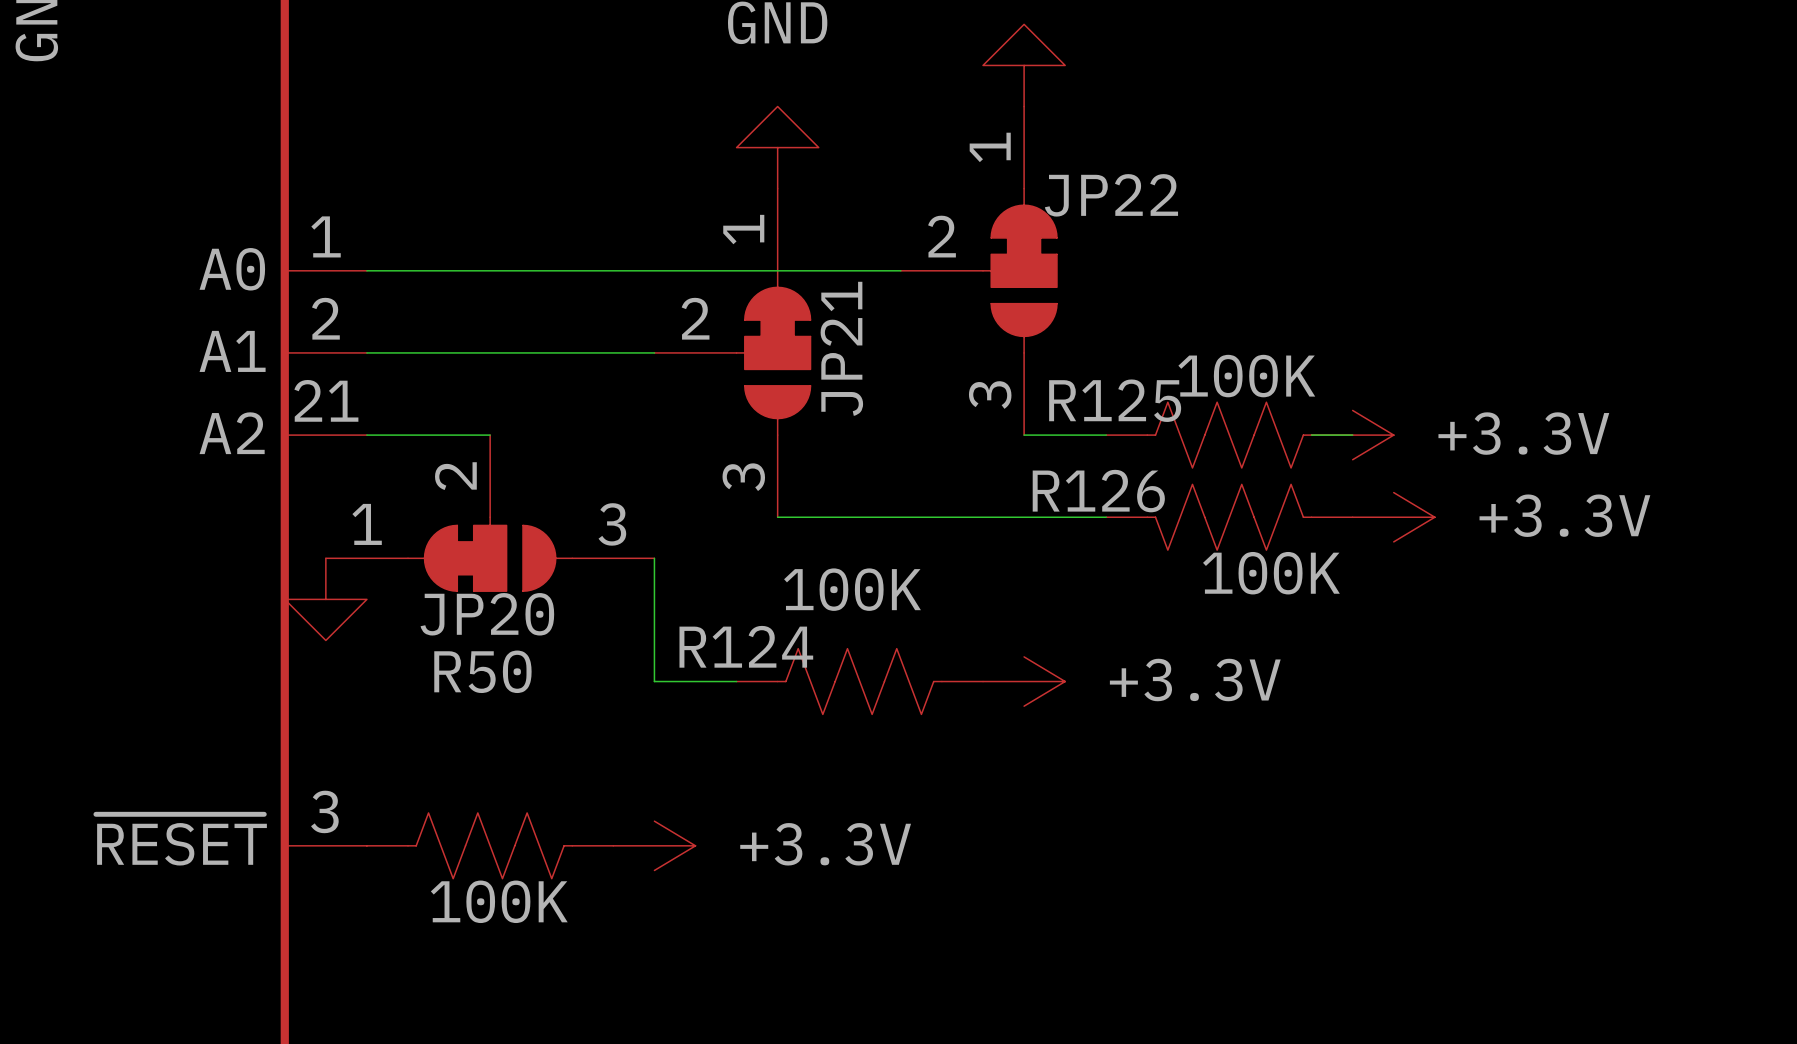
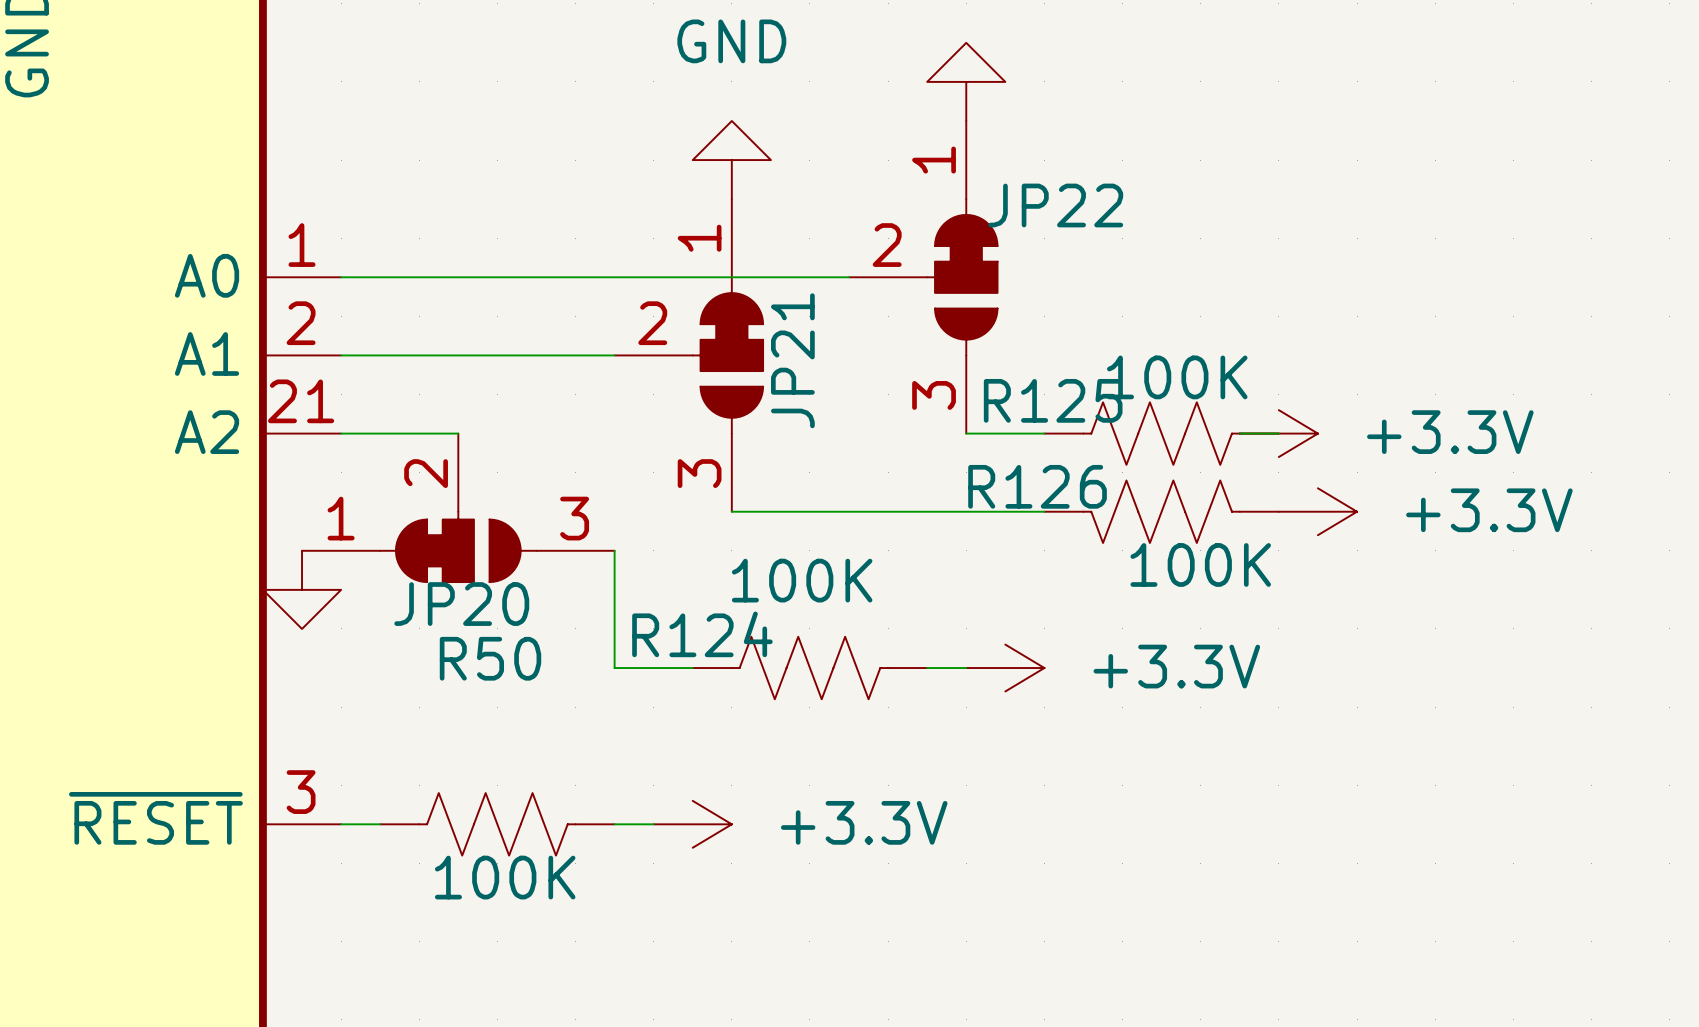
power symbol position: +3.3V (1024, 681) -> +3.3V (1005, 668)
R50 position: (490, 845) -> (497, 824)
power symbol position: +3.3V (654, 845) -> +3.3V (692, 824)

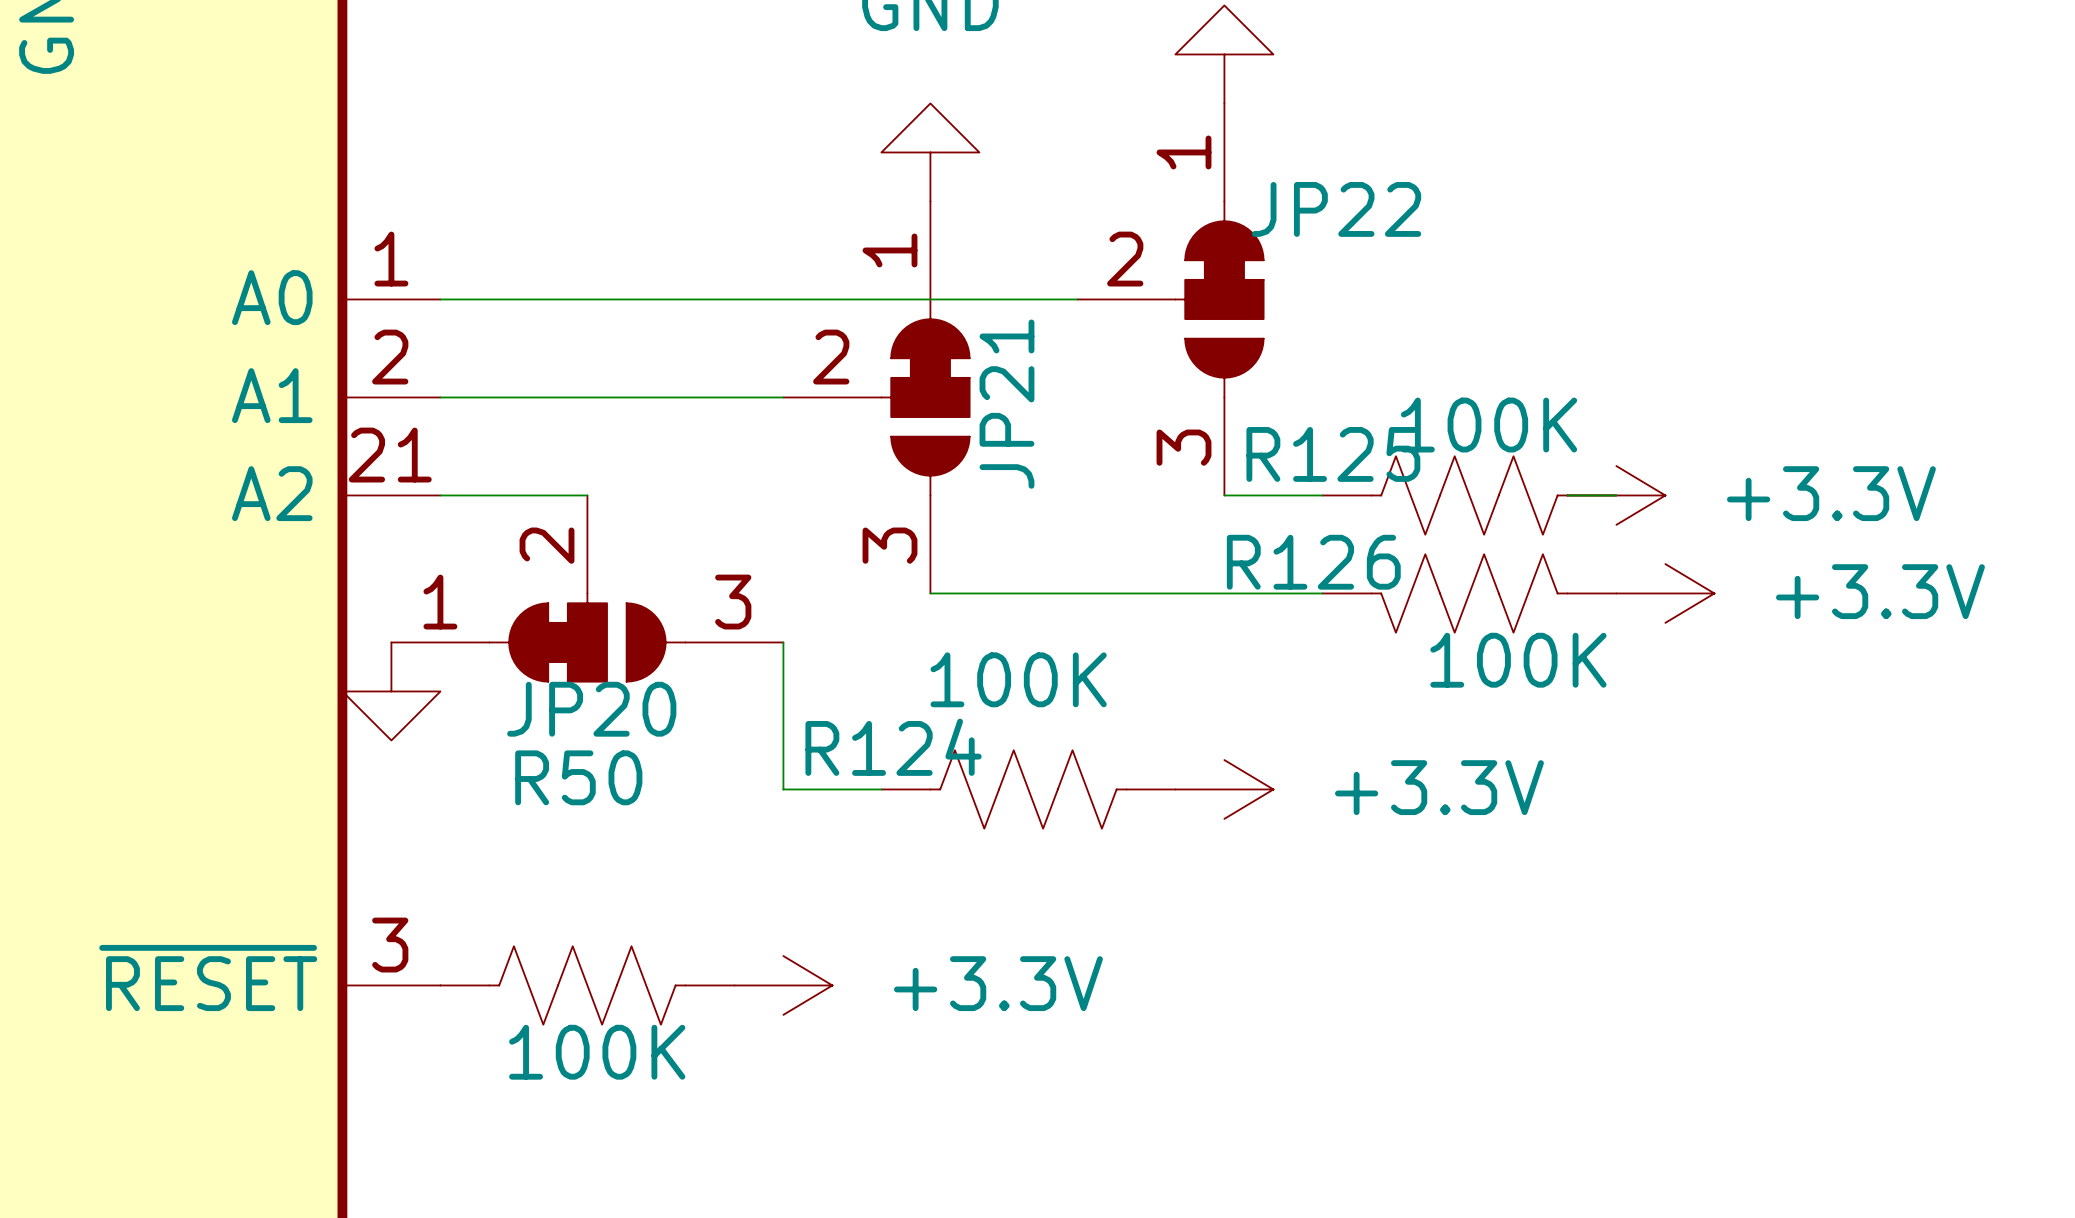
power symbol position: +3.3V (1005, 668) -> +3.3V (1224, 789)
R50 position: (497, 824) -> (587, 985)
power symbol position: +3.3V (692, 824) -> +3.3V (783, 985)

